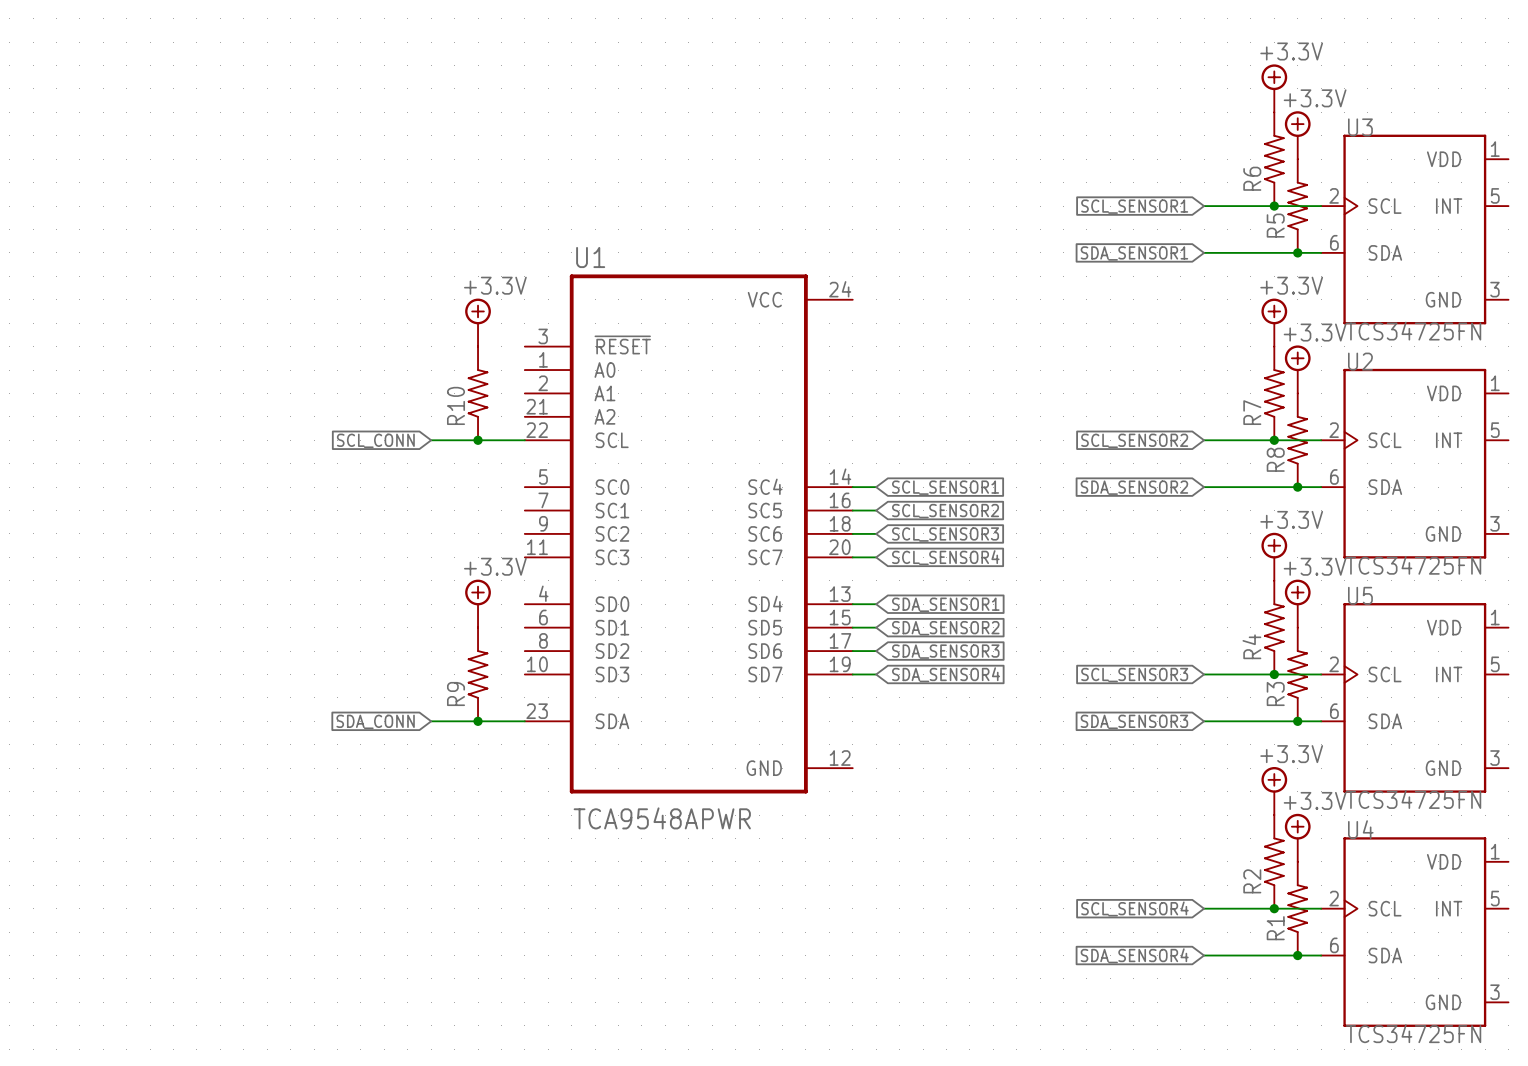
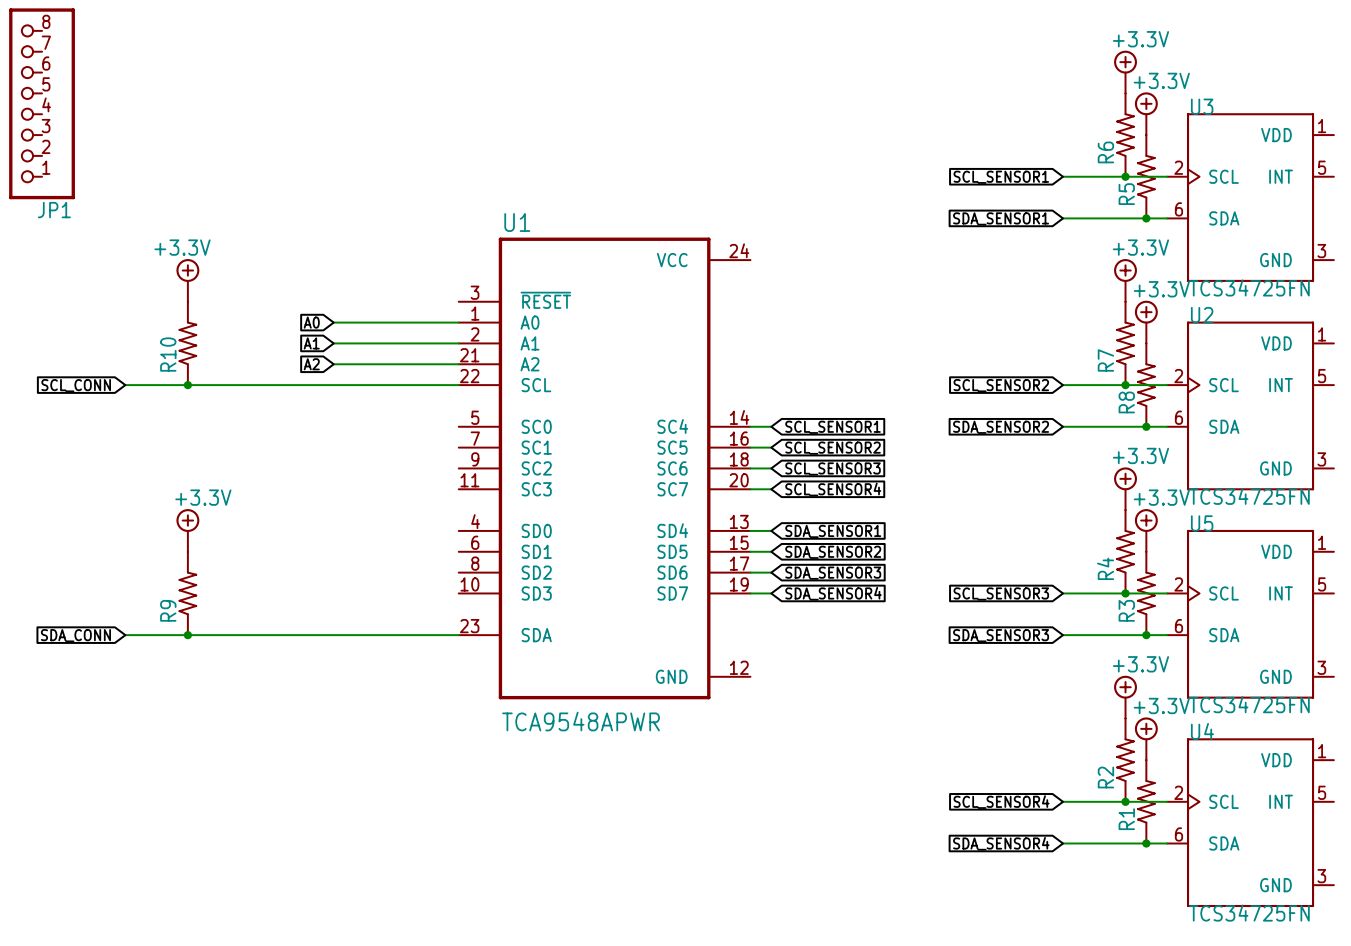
JP1: none -> (42, 103)
power symbol: none -> +3.3V (187, 280)
power symbol: +3.3V (478, 322) -> none
global label: none -> A0 (311, 322)
wire: none -> (333, 322) (458, 322)
global label: none -> A1 (311, 343)
wire: none -> (333, 343) (458, 343)
R10 position: (478, 393) -> (187, 343)
global label: none -> A2 (311, 364)
wire: none -> (333, 364) (458, 364)
global label: none -> SCL_CONN (76, 385)
wire: none -> (125, 385) (375, 385)
junction: none -> (187, 385)
global label: SCL_CONN (375, 440) -> none
junction: (478, 440) -> none
power symbol: none -> +3.3V (187, 530)
power symbol: +3.3V (478, 603) -> none
R9 position: (478, 674) -> (187, 593)
global label: none -> SDA_CONN (75, 635)
wire: none -> (125, 635) (375, 635)
junction: none -> (187, 635)
global label: SDA_CONN (375, 721) -> none
junction: (478, 721) -> none

